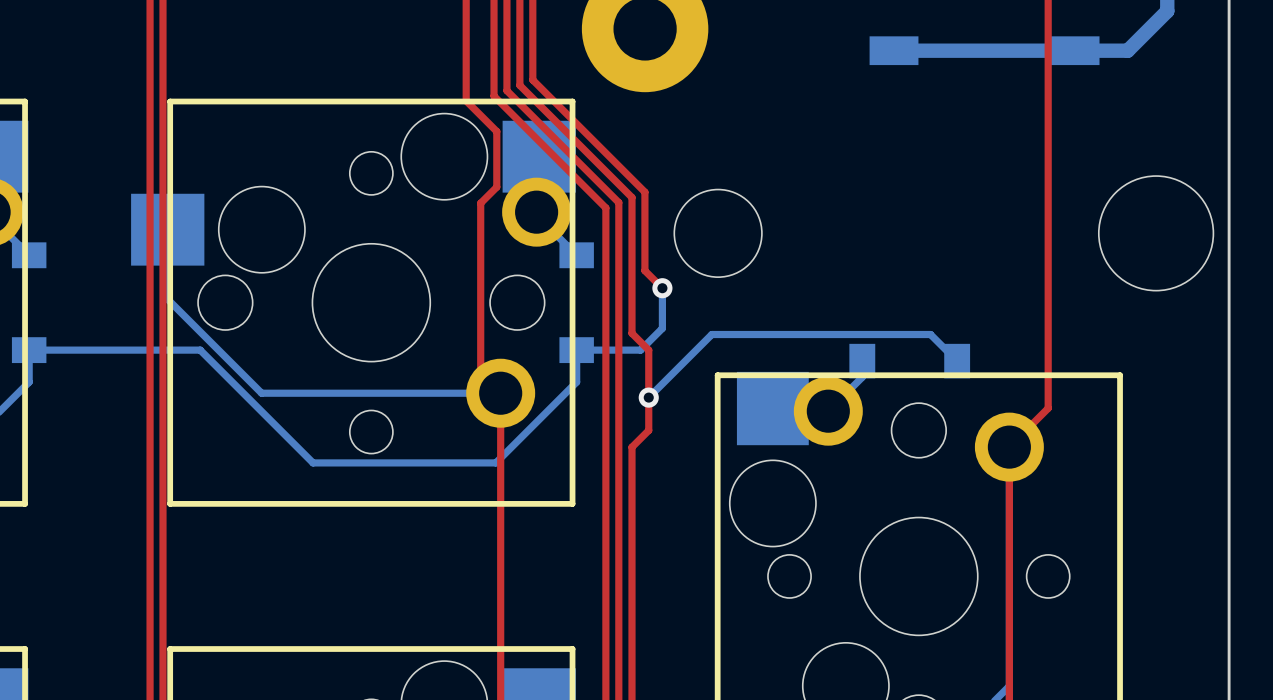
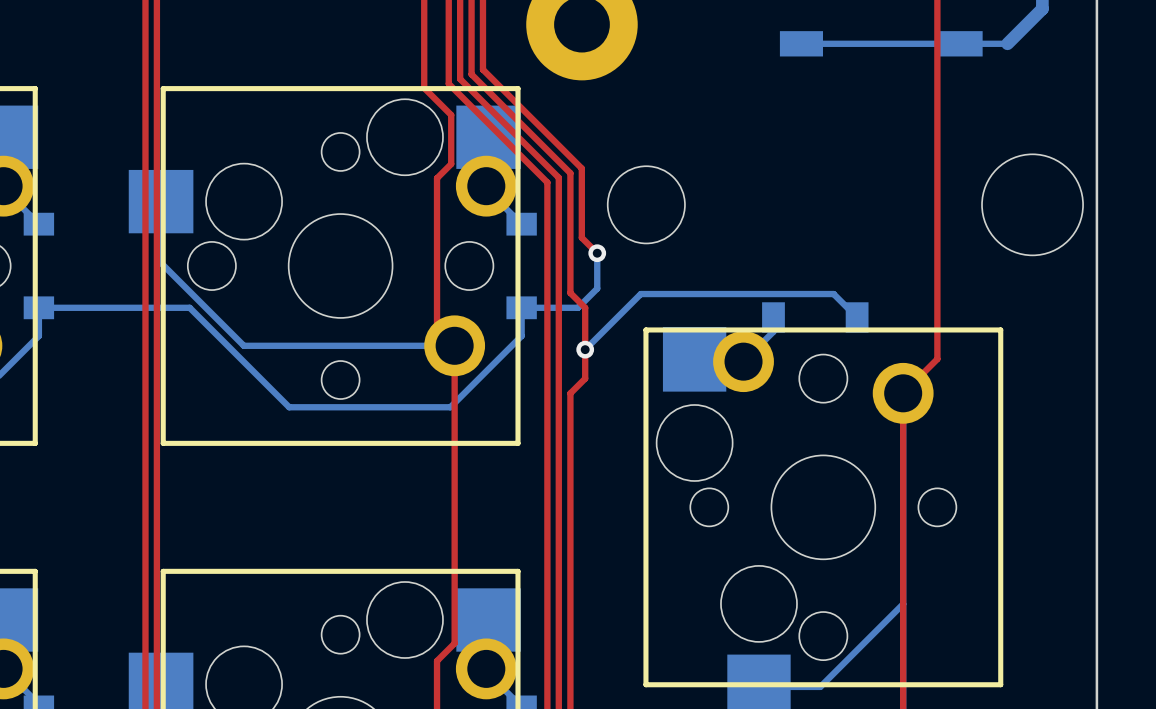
bottom track width: thick (894, 50) (1127, 50) -> thin (801, 43) (1007, 43)

